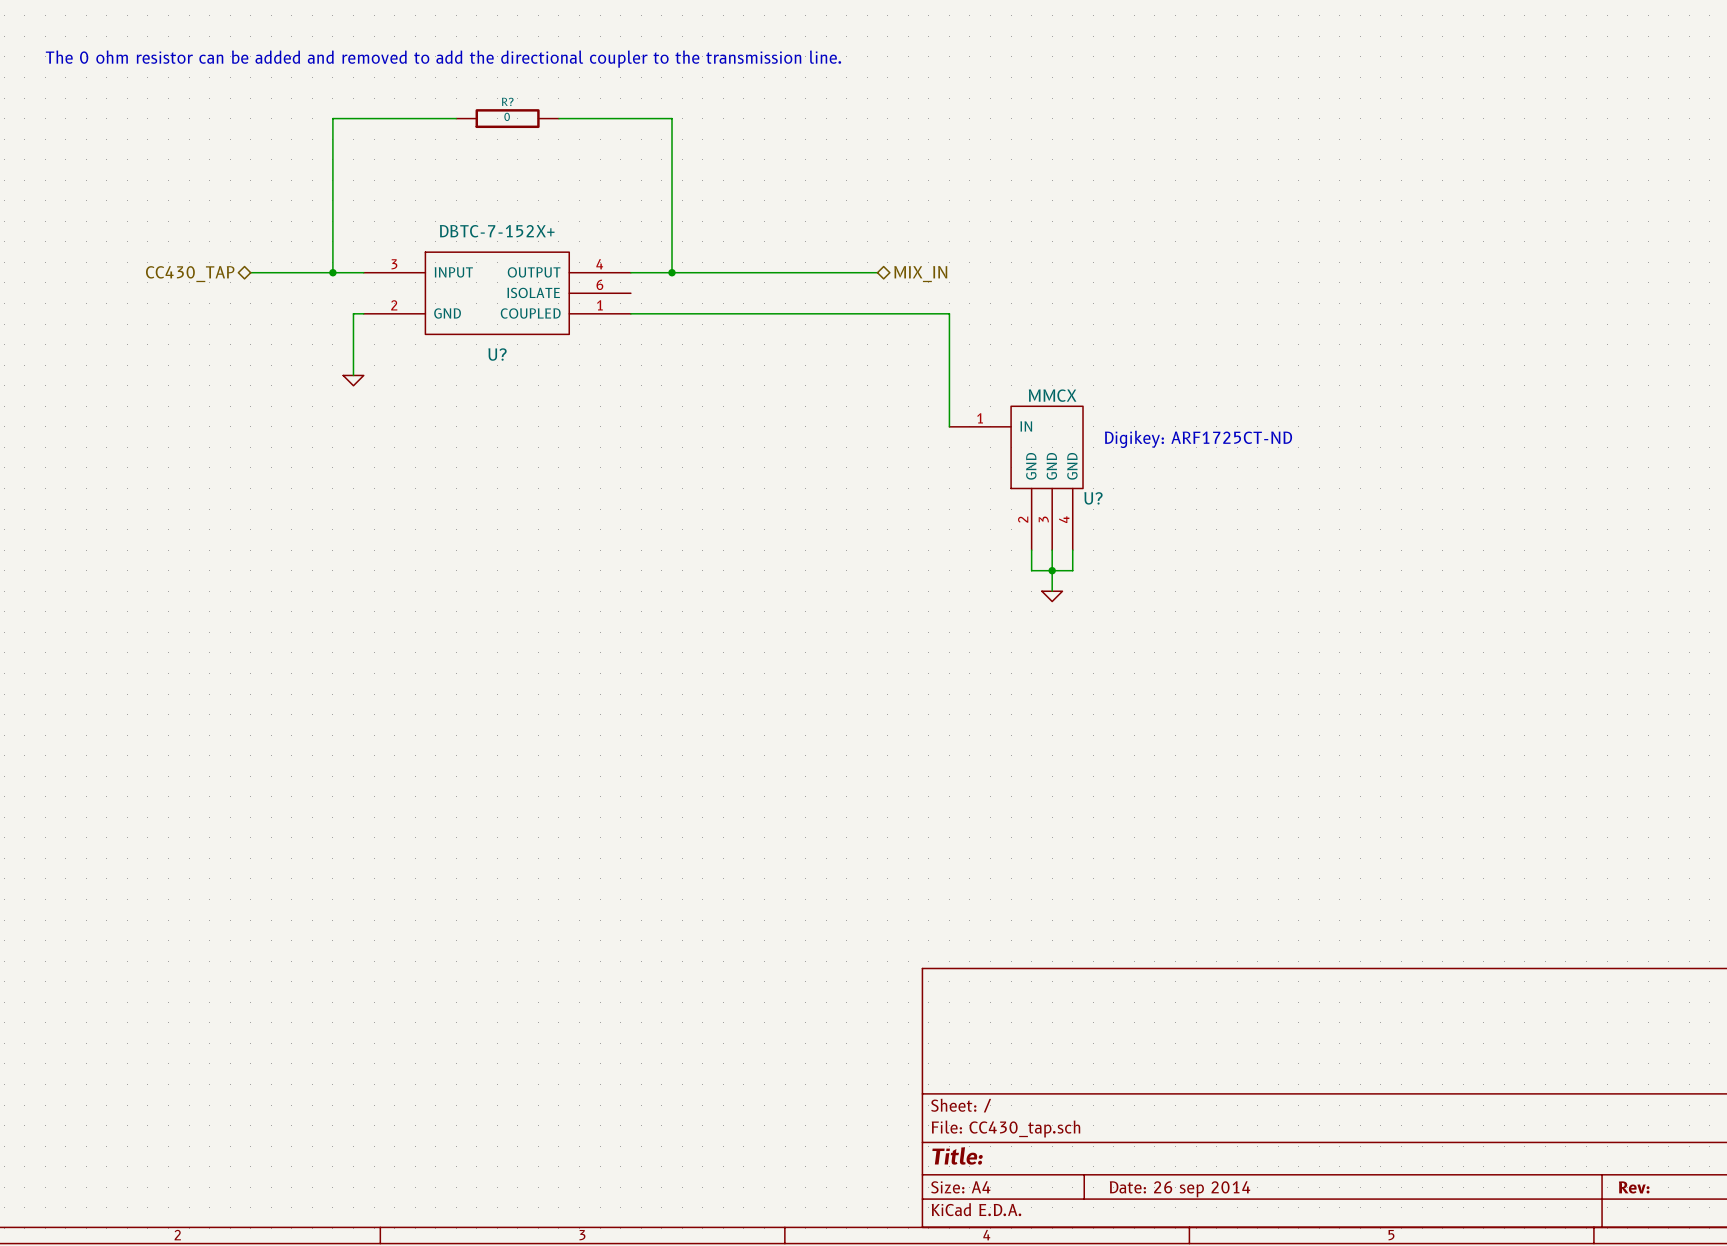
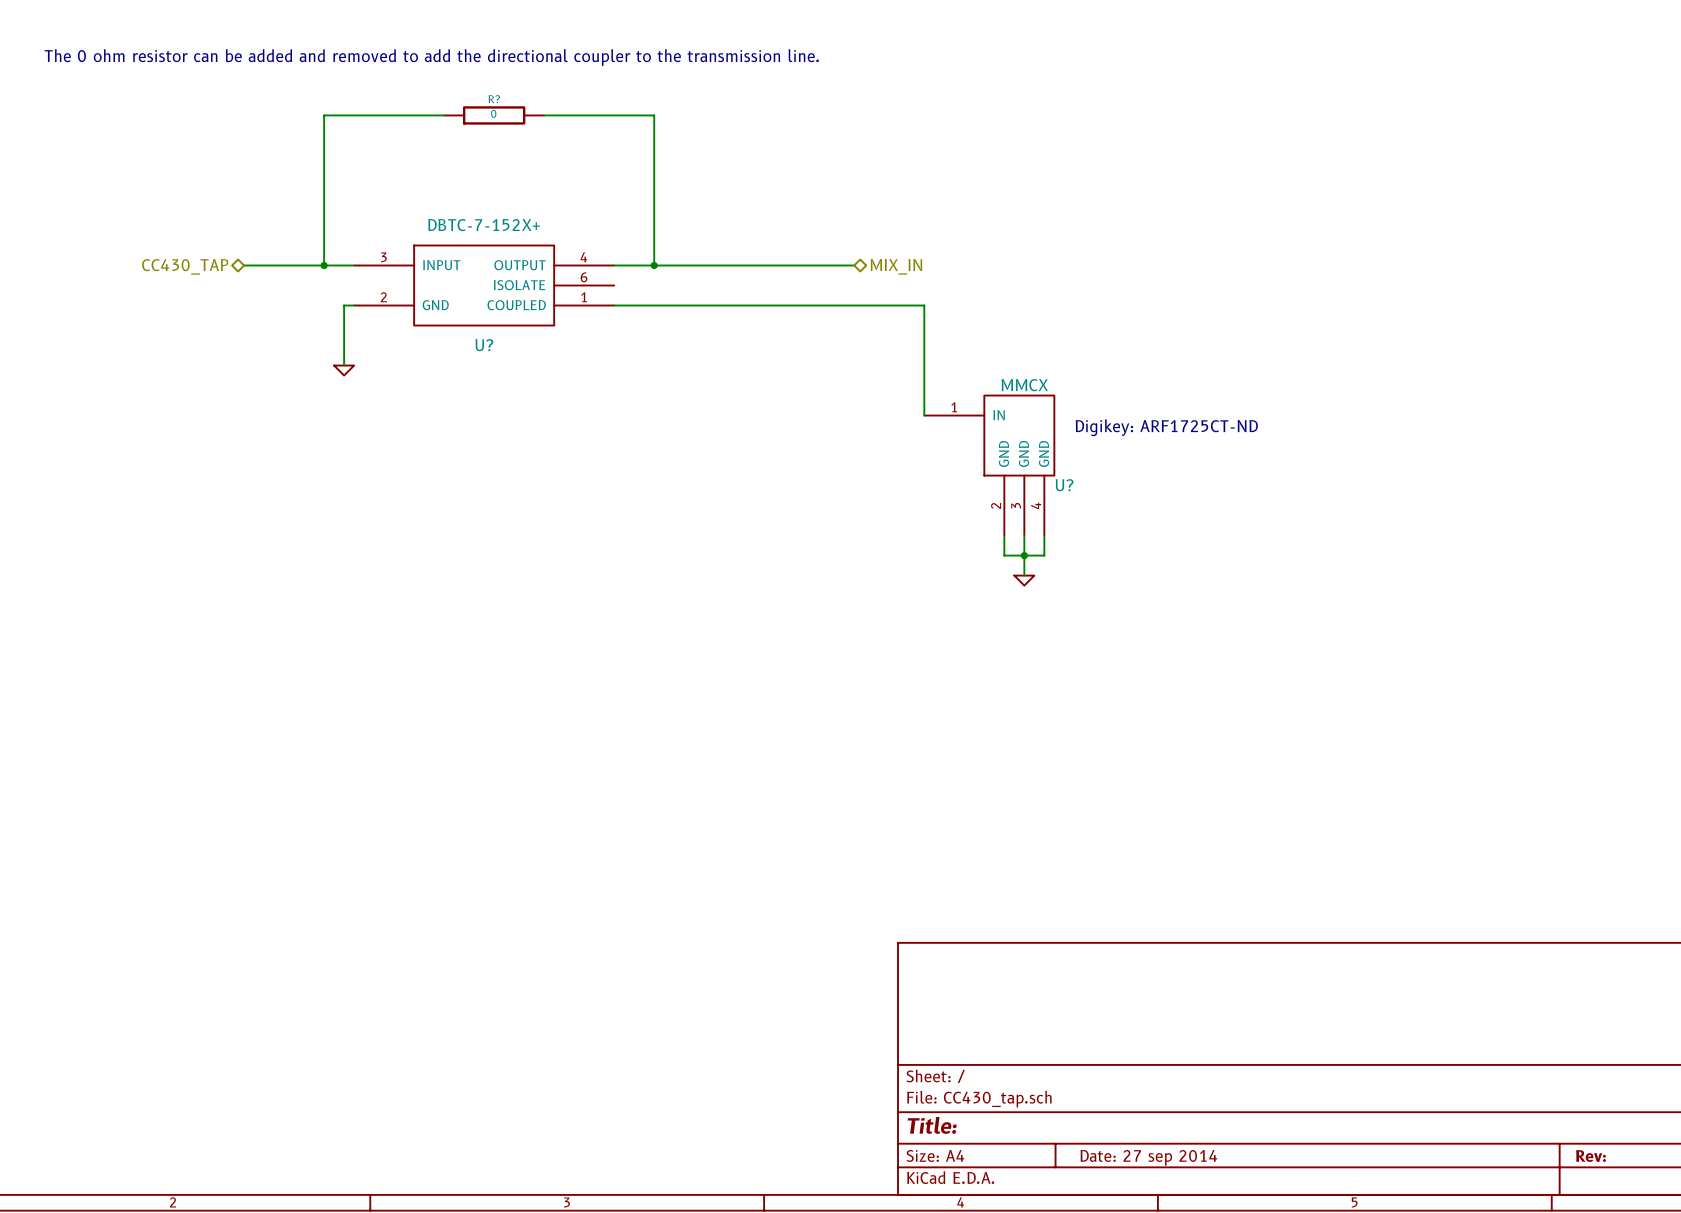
title block: Date: 26 sep 2014 (1180, 1189) -> Date: 27 sep 2014 (1148, 1157)

